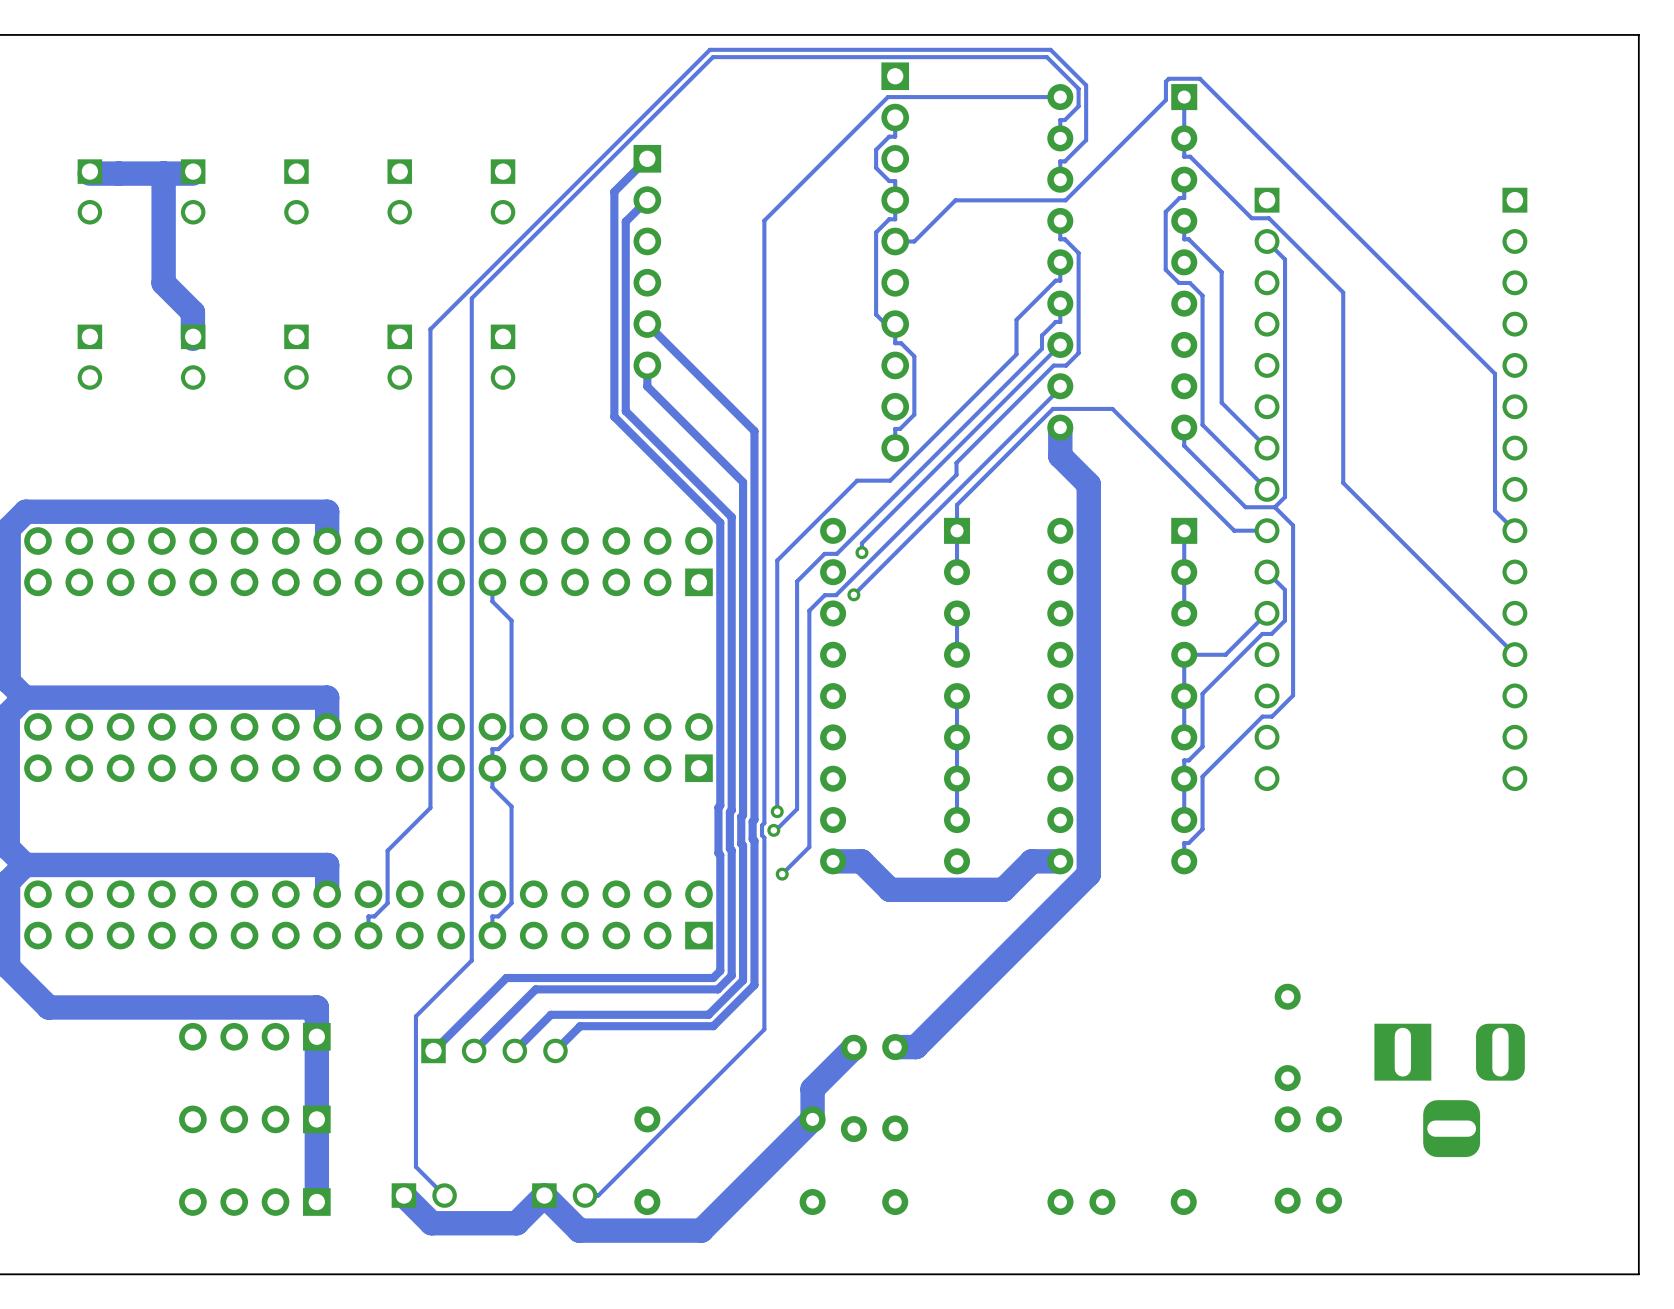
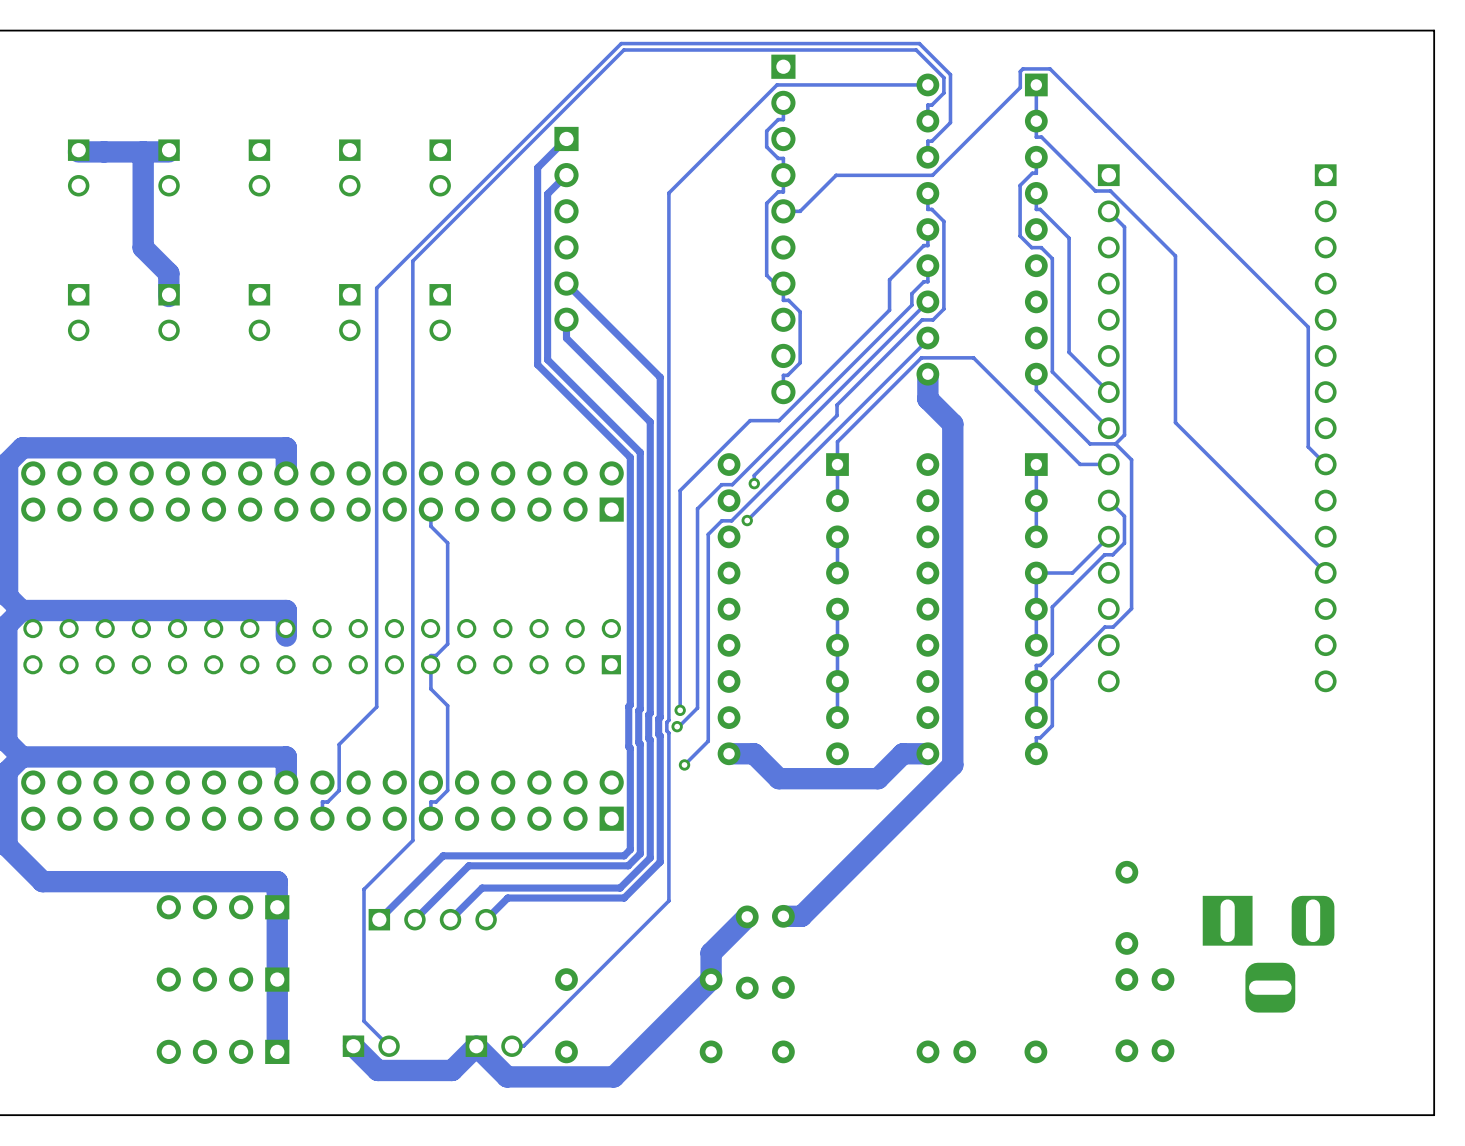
part footprint: [24, 713, 713, 783] -> [23, 618, 621, 675]

